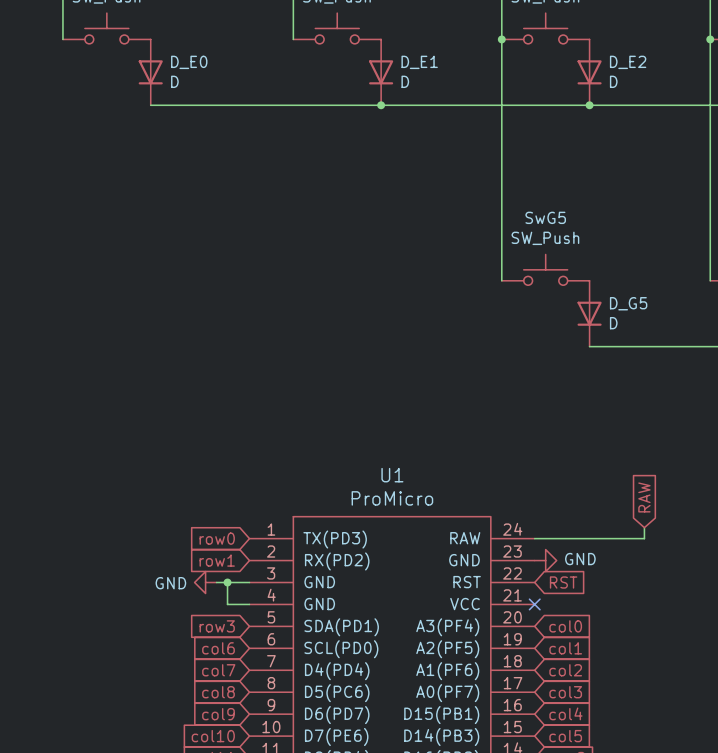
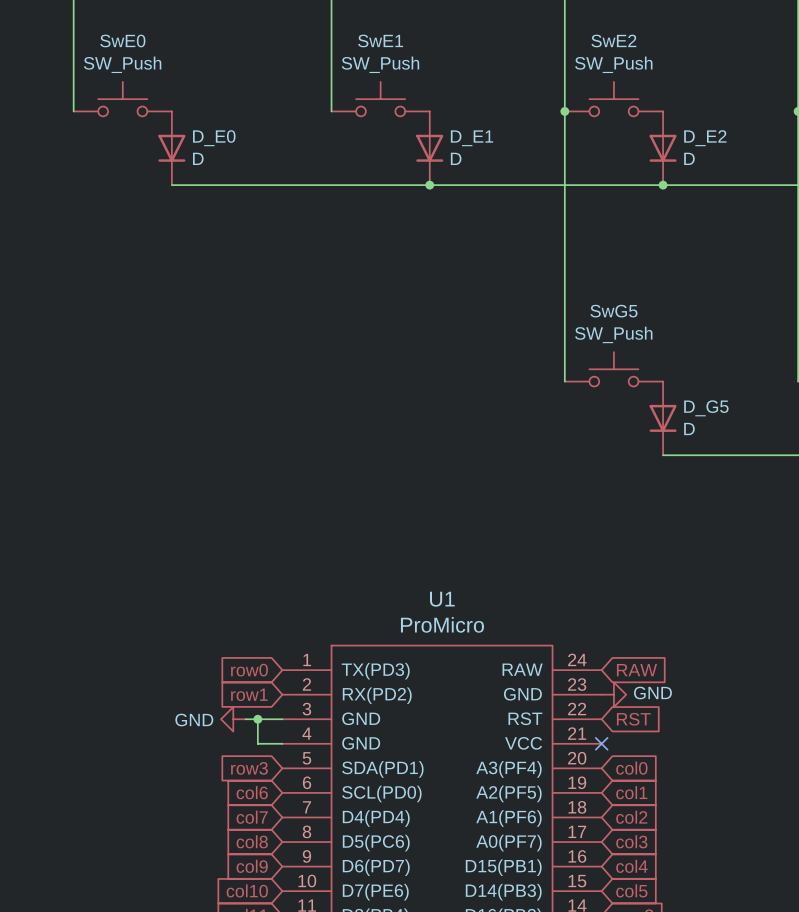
global label rotation: 0° (644, 497) -> 90° clockwise (637, 670)
global label position: RAW (644, 497) -> RAW (637, 670)
wire: (644, 527) (644, 538) (534, 538) -> none

